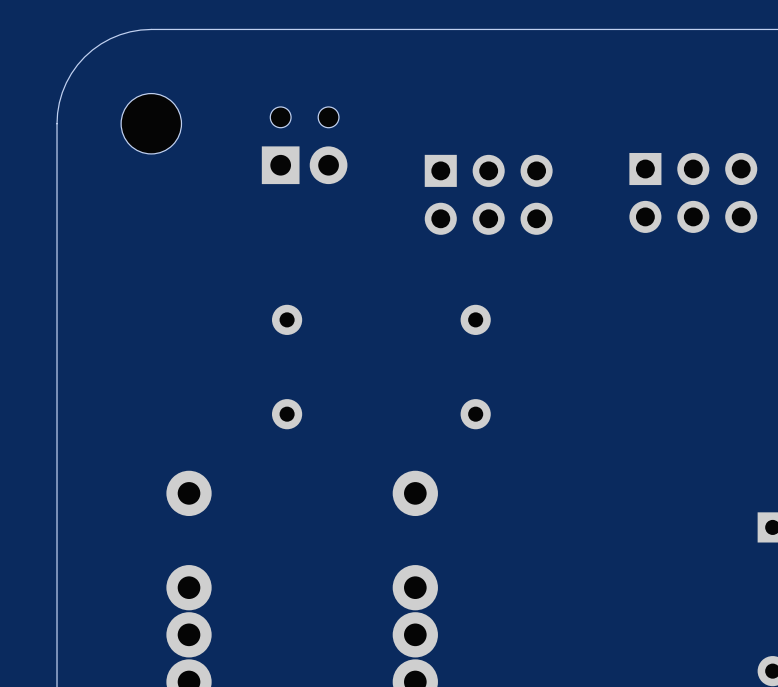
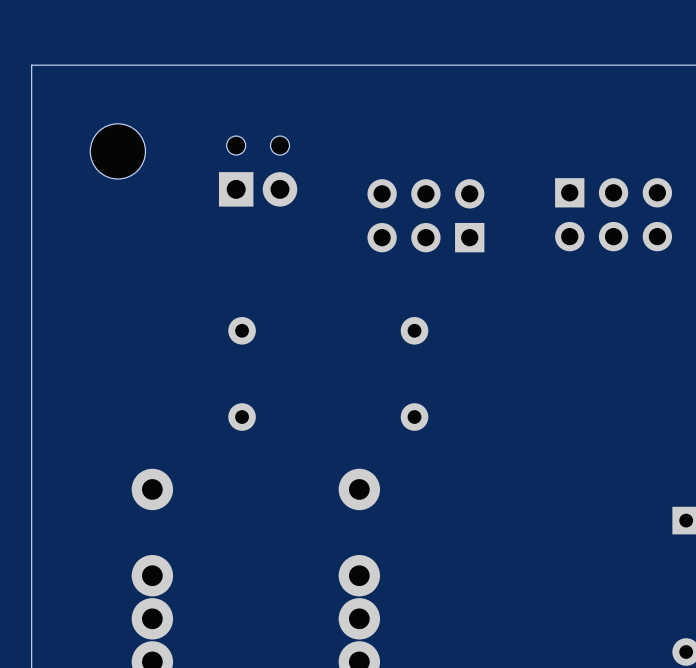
board edge: (151, 29) (130, 31) (110, 38) (84, 57) (71, 73) (62, 92) (57, 123) -> (117, 65) (31, 65) (31, 151)
part rotation: 0° (488, 194) -> 180° (425, 215)

